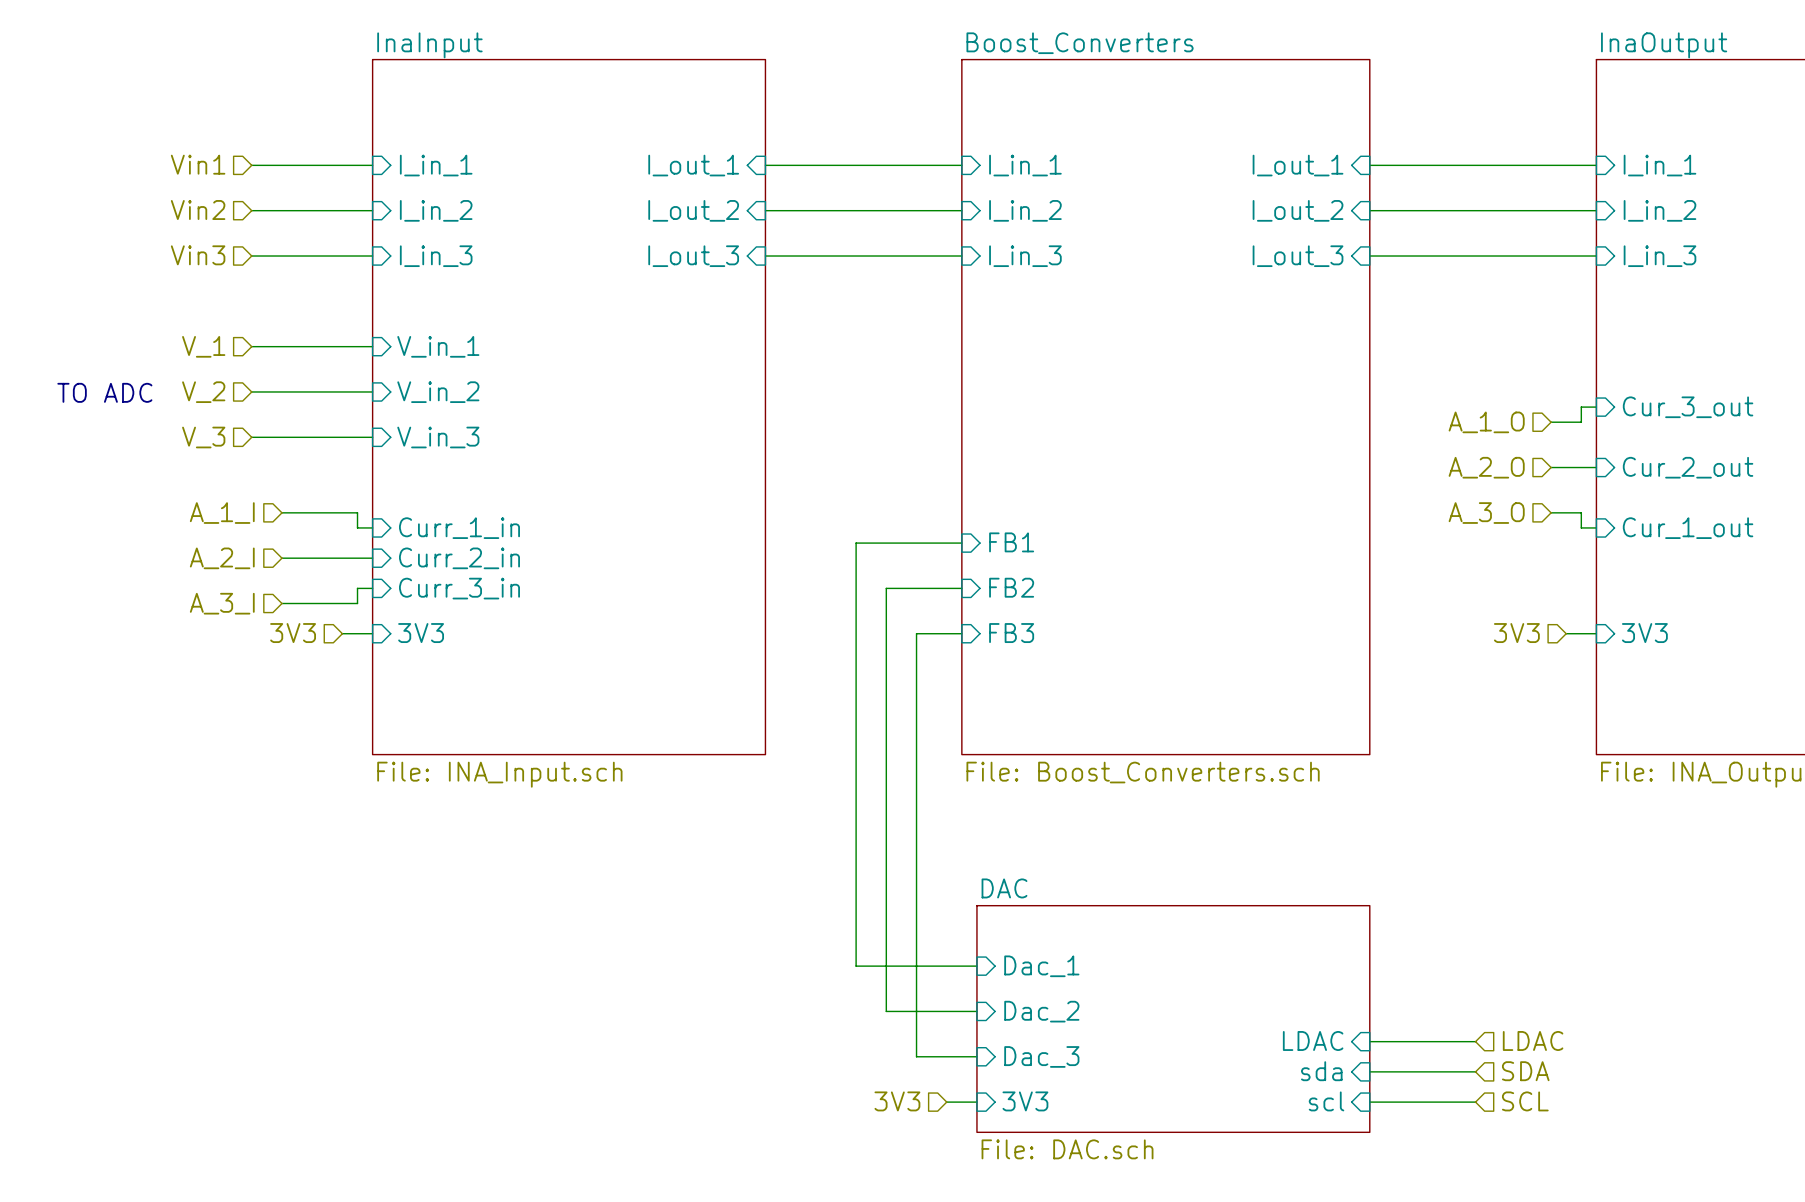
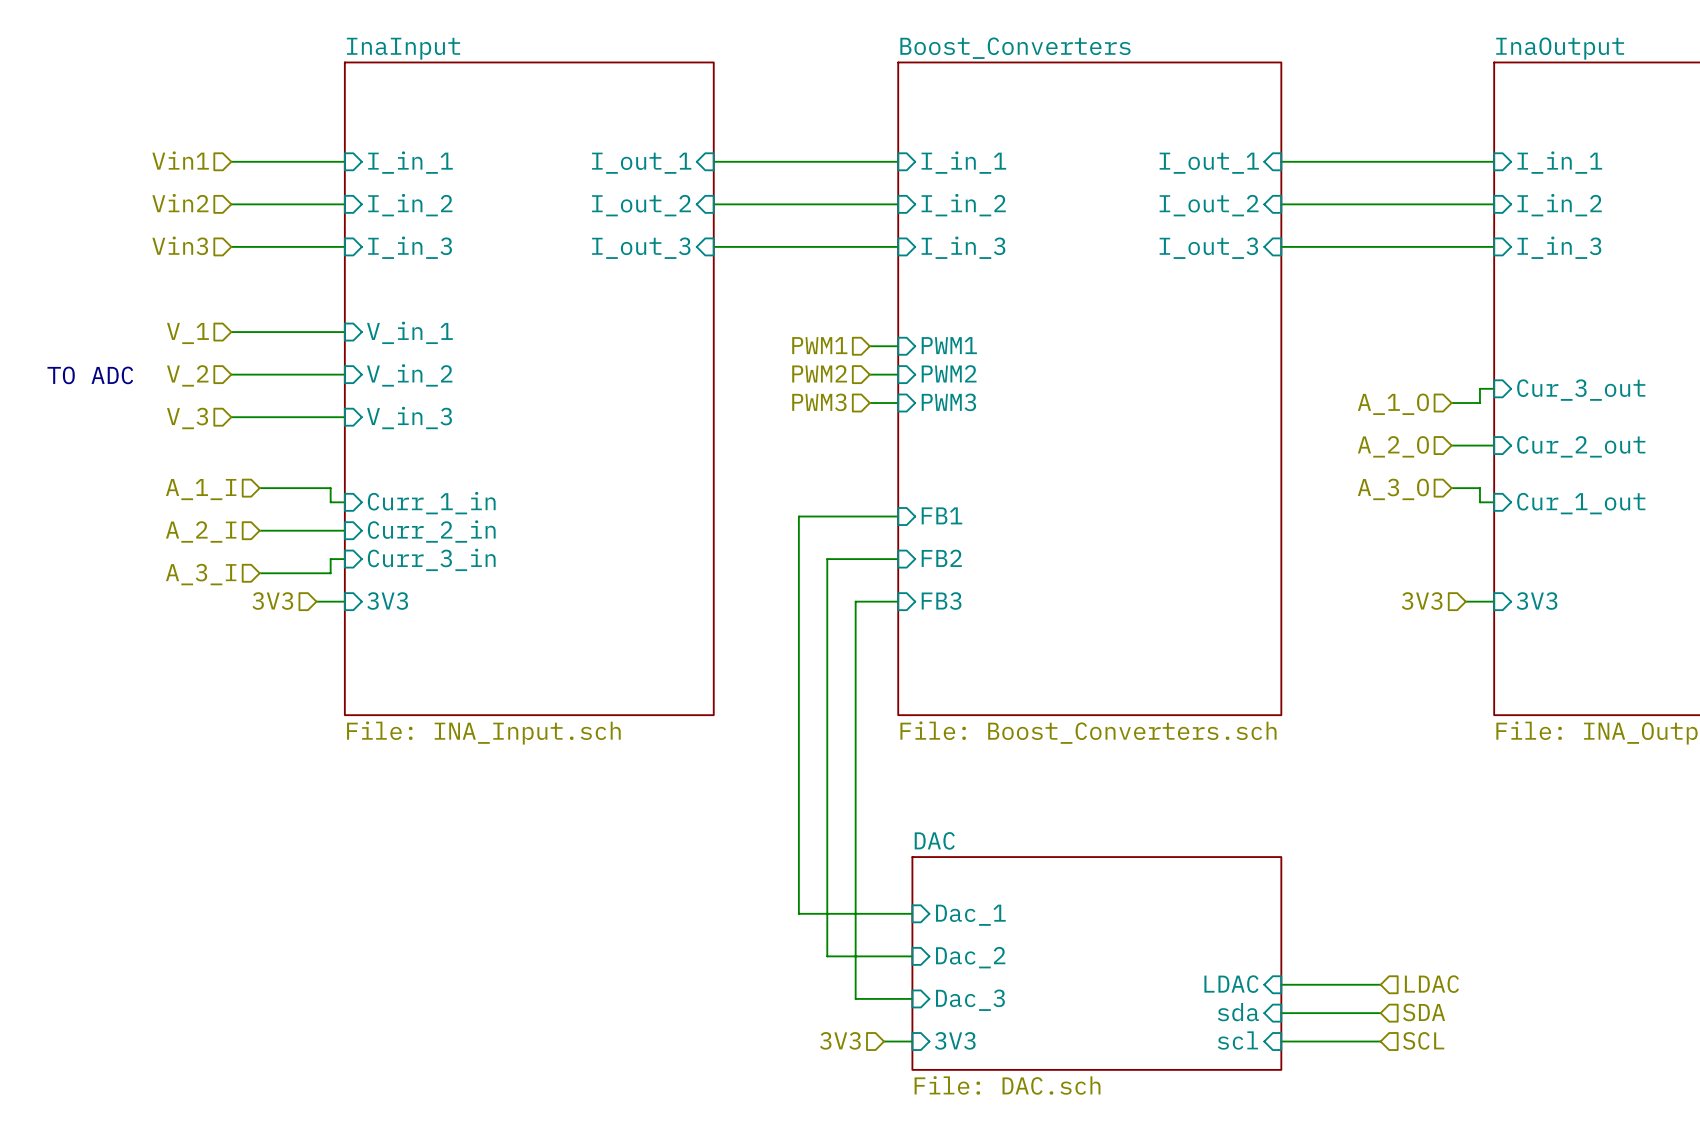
hierarchical label: none -> PWM1 (819, 345)
wire: none -> (869, 346) (898, 346)
sheet pin: none -> PWM1 (949, 345)
hierarchical label: none -> PWM2 (819, 373)
wire: none -> (869, 374) (898, 374)
sheet pin: none -> PWM2 (949, 373)
hierarchical label: none -> PWM3 (819, 402)
sheet pin: none -> PWM3 (948, 402)
wire: none -> (869, 403) (898, 403)

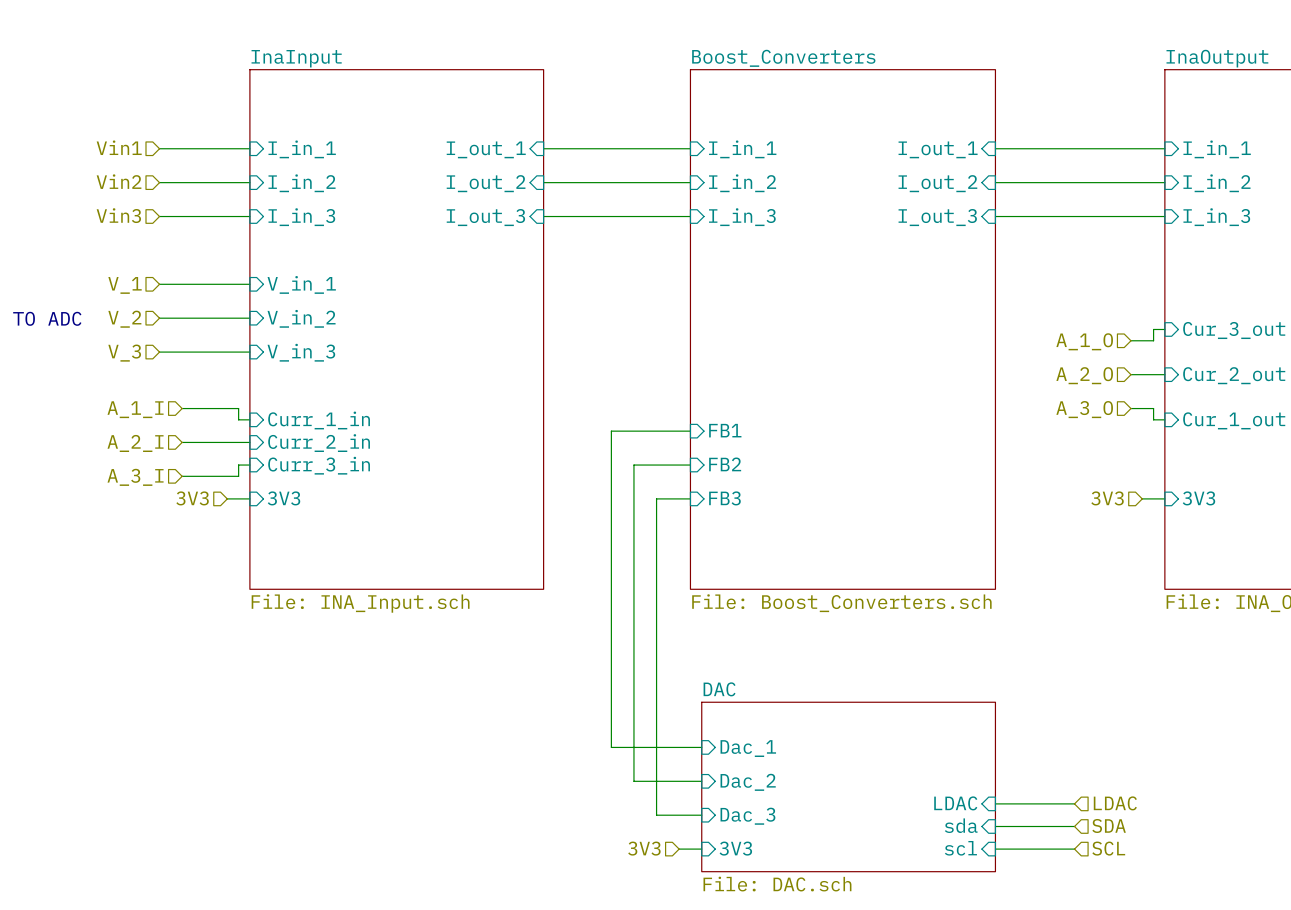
hierarchical label: PWM1 (819, 345) -> none
sheet pin: PWM1 (949, 345) -> none
wire: (869, 346) (898, 346) -> none
hierarchical label: PWM2 (819, 373) -> none
sheet pin: PWM2 (949, 373) -> none
wire: (869, 374) (898, 374) -> none
hierarchical label: PWM3 (819, 402) -> none
sheet pin: PWM3 (948, 402) -> none
wire: (869, 403) (898, 403) -> none

